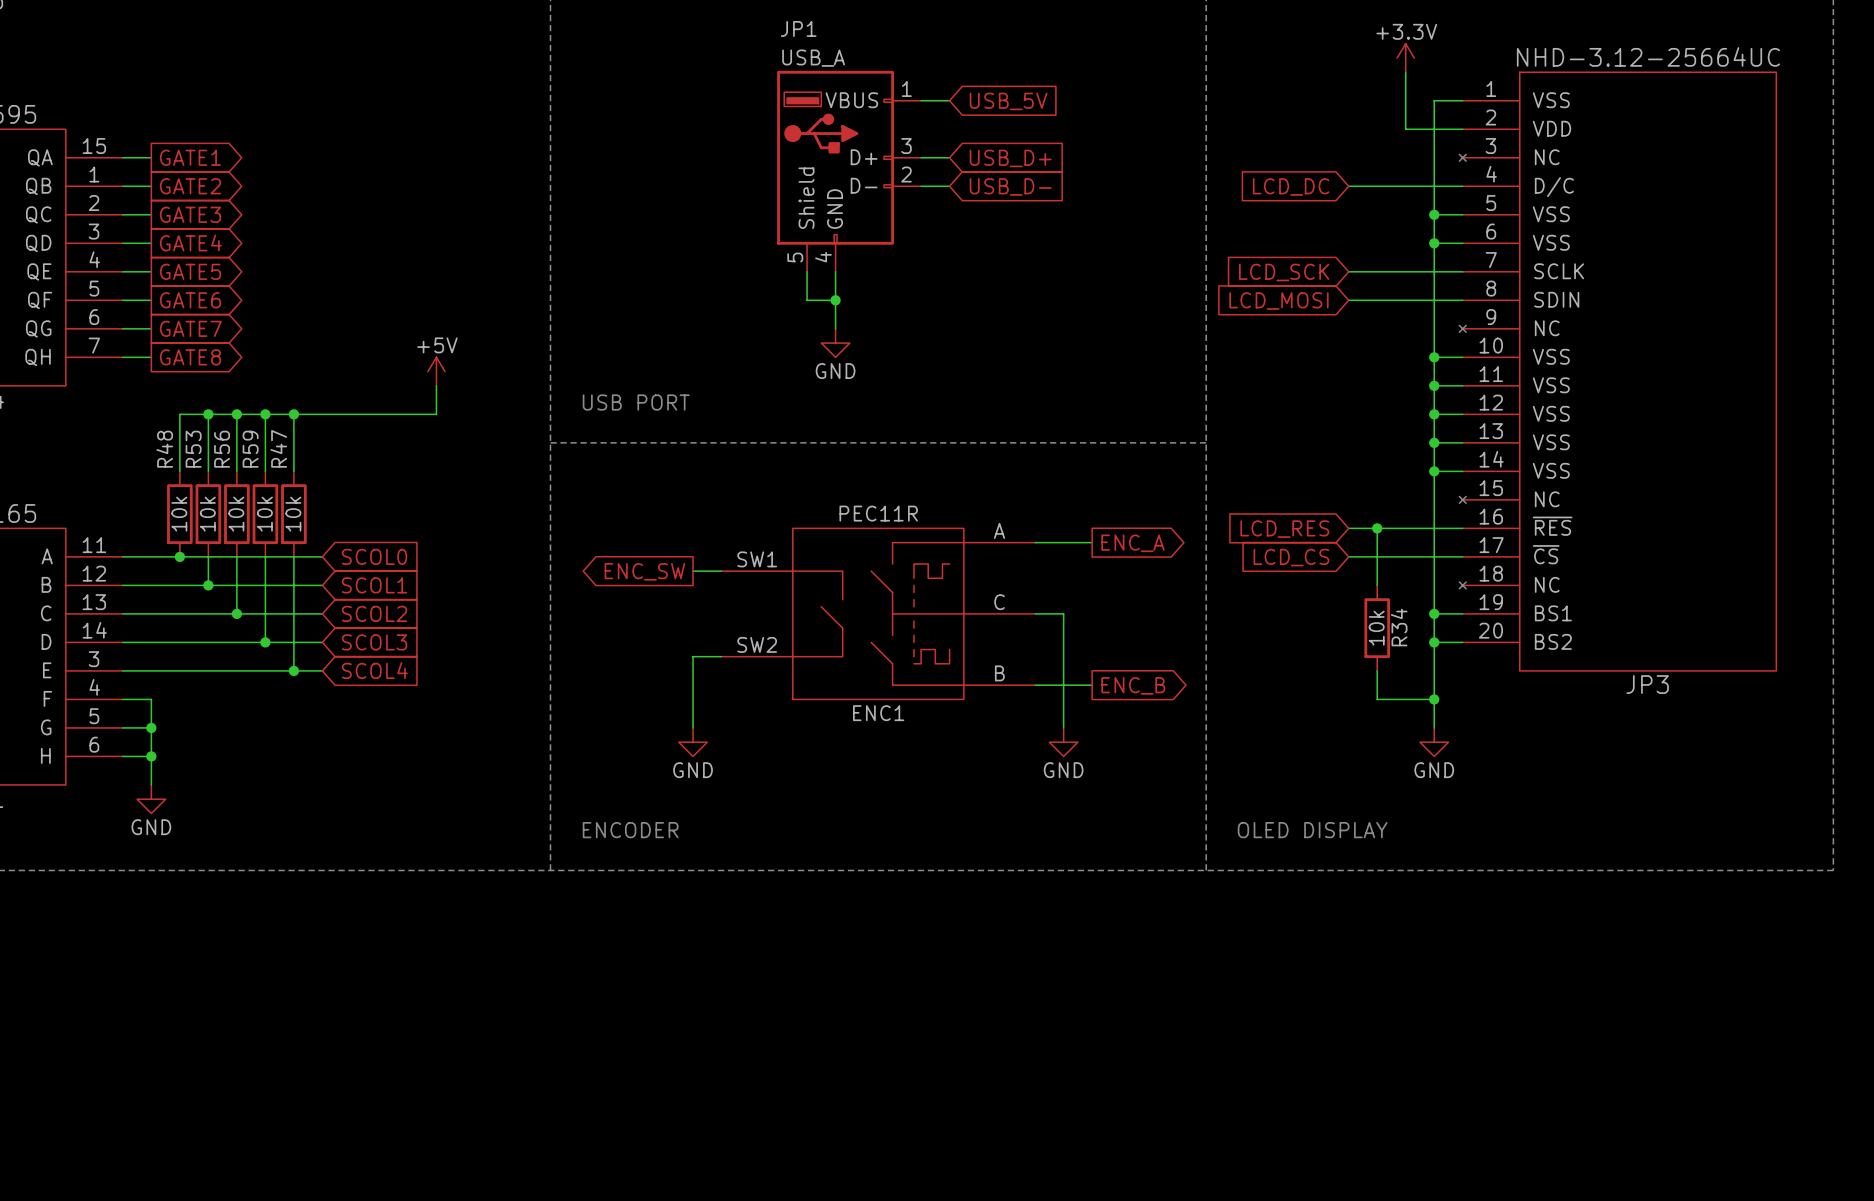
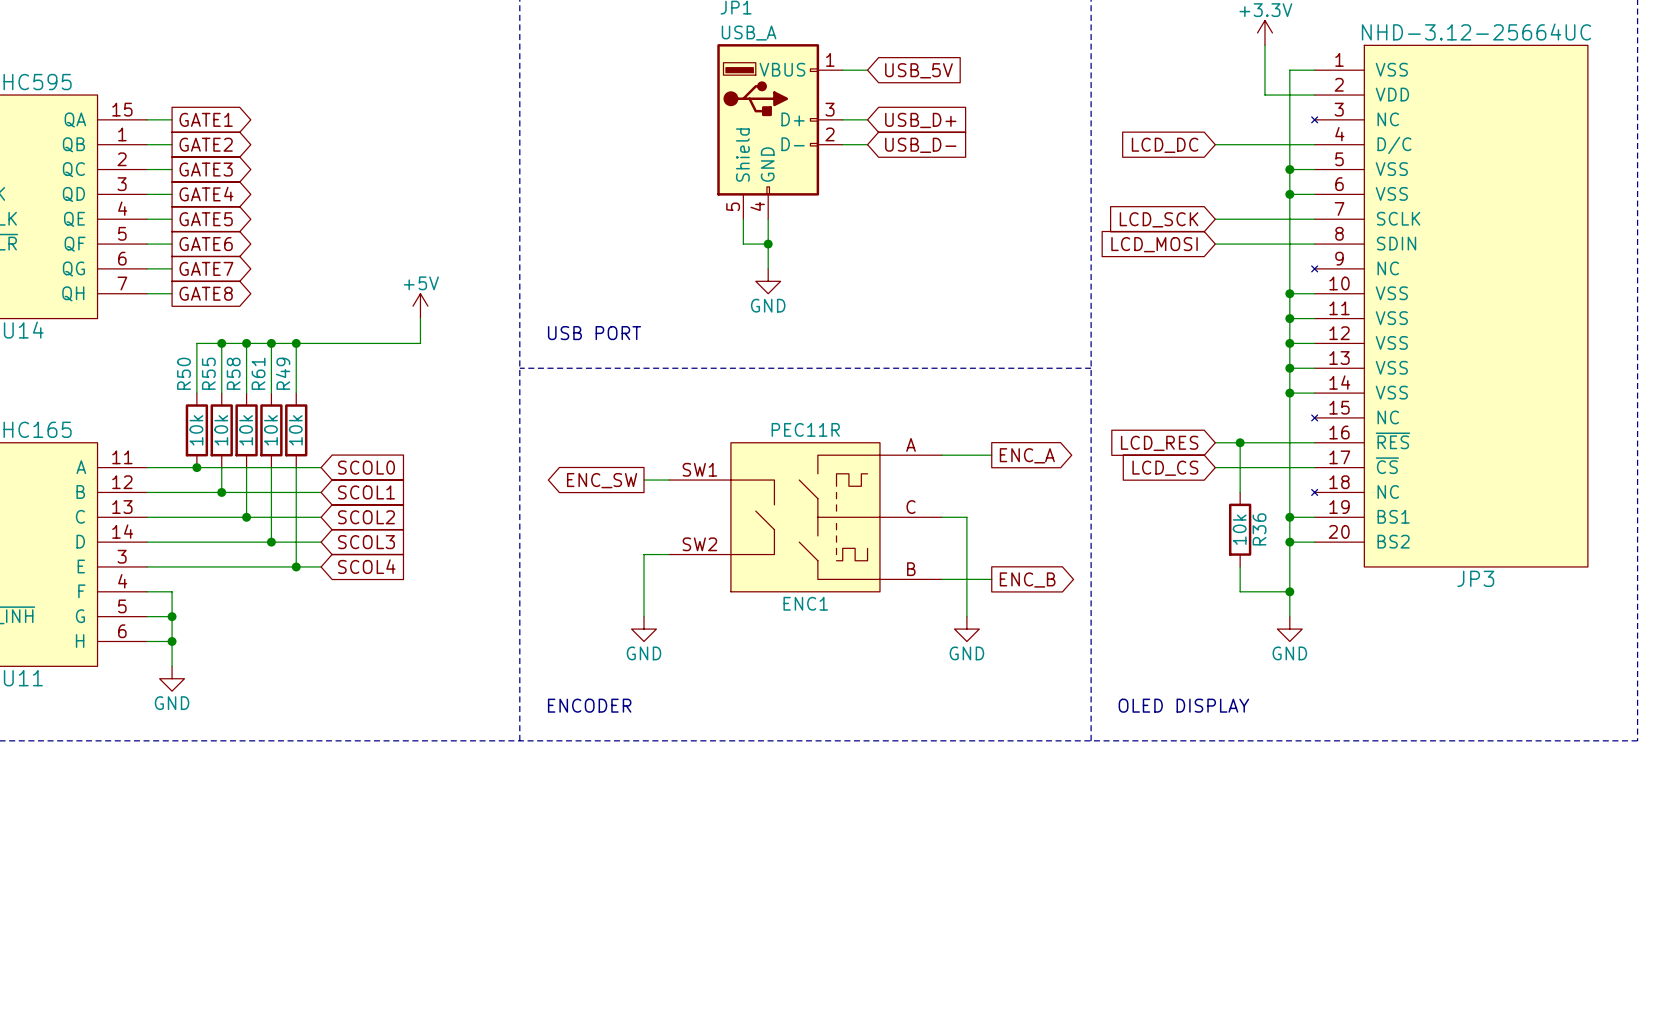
R47 name: R47 (278, 448) -> R49 (283, 373)
R48 name: R48 (164, 449) -> R50 (184, 373)
R53 name: R53 (193, 449) -> R55 (208, 373)
R56 name: R56 (222, 449) -> R58 (233, 373)
R59 name: R59 (250, 449) -> R61 (258, 373)
R34 name: R34 (1399, 627) -> R36 (1259, 529)

